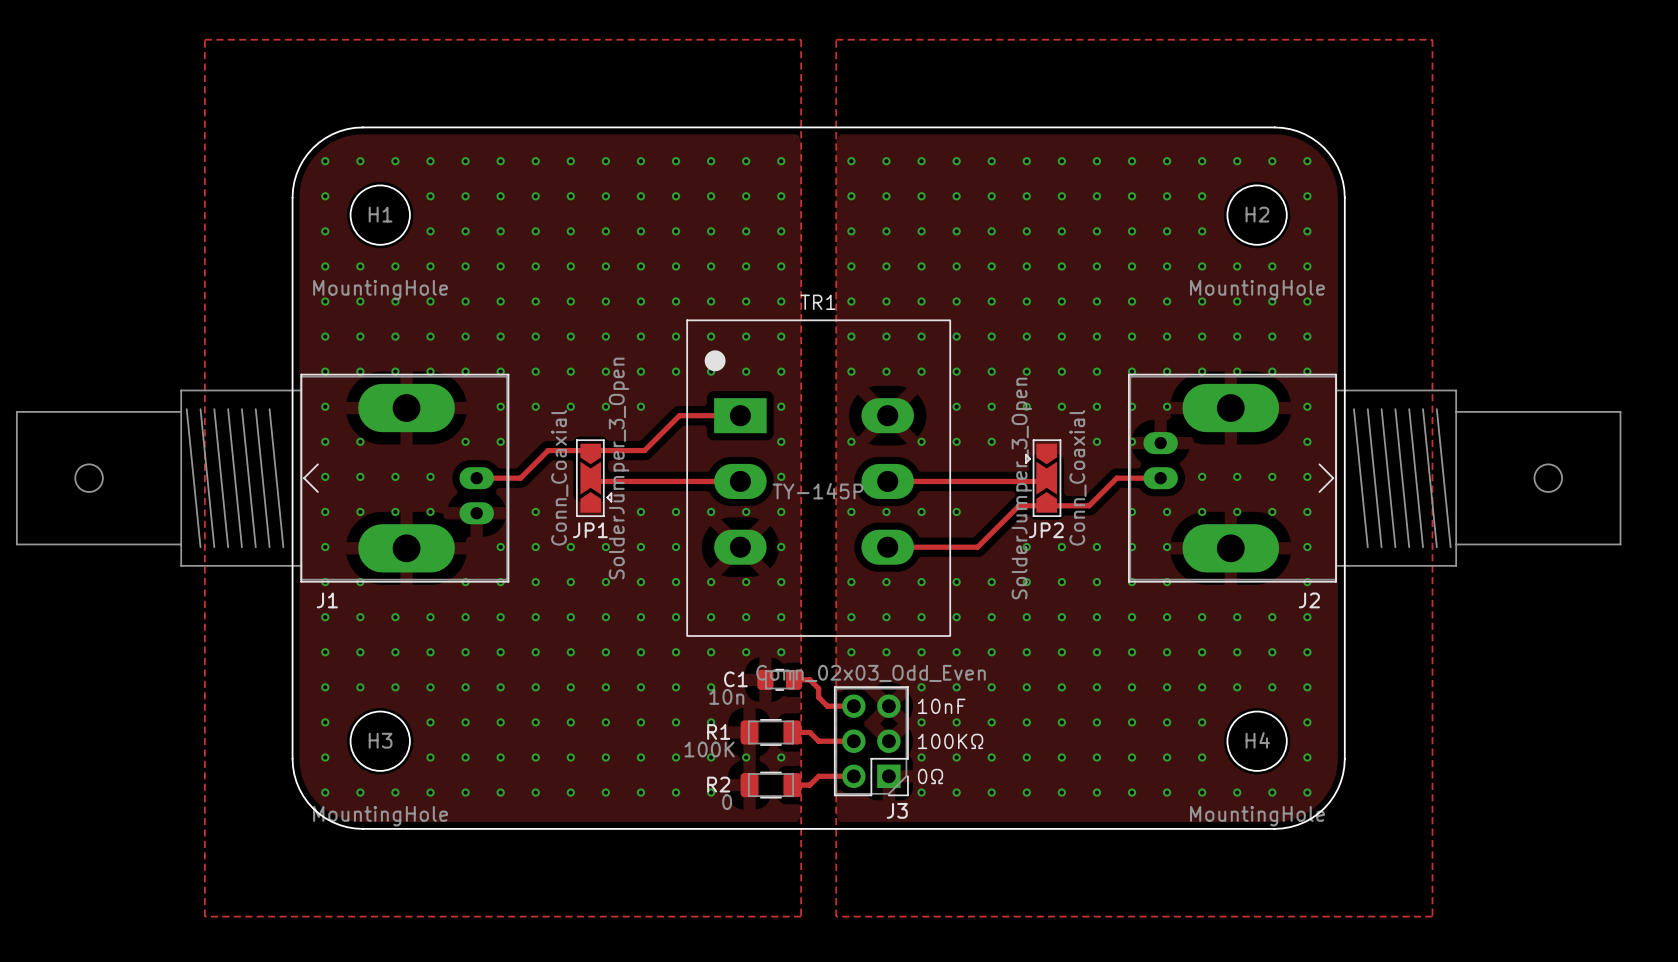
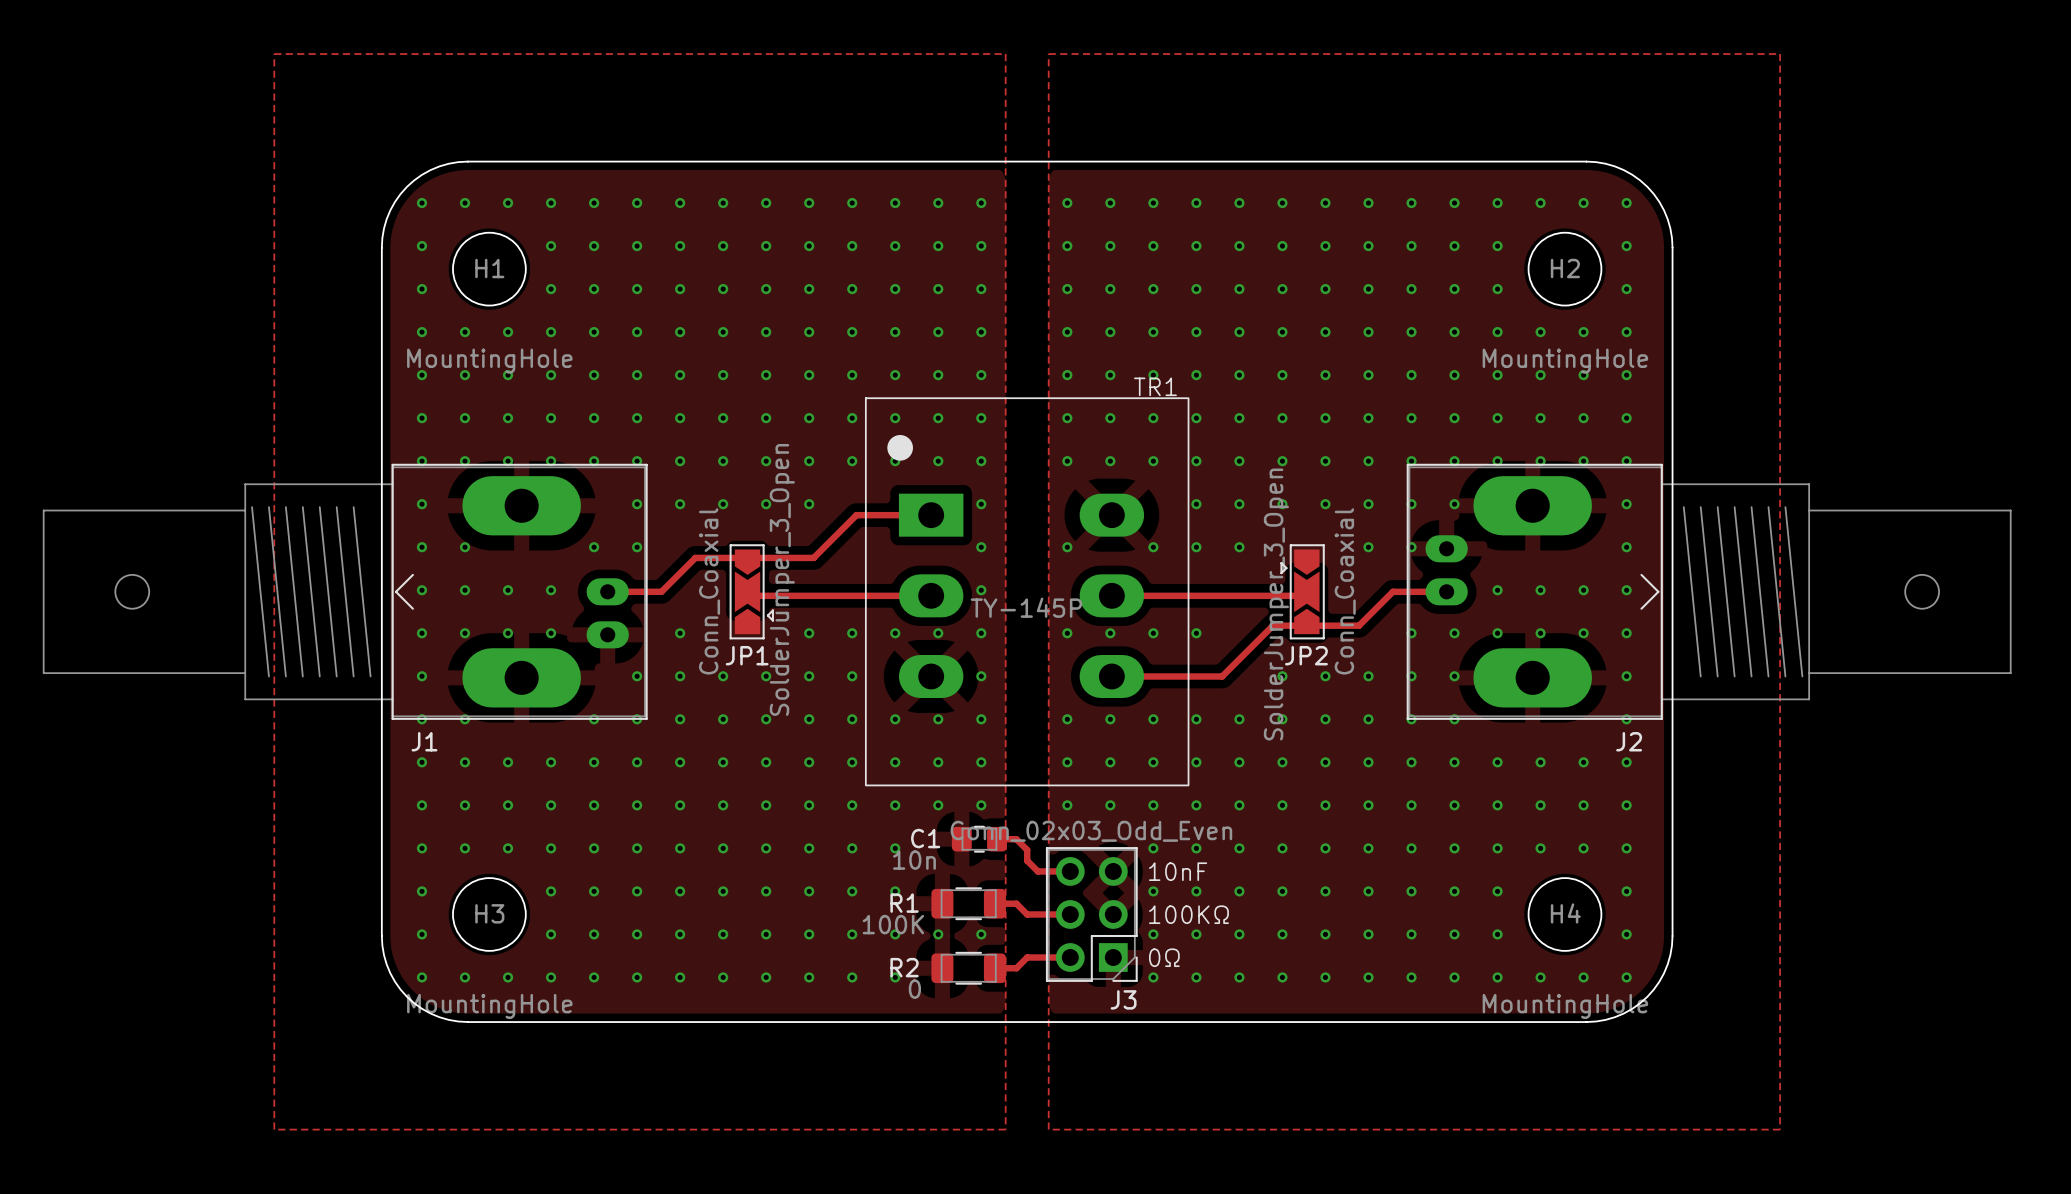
TR1 name position: TR1 (818, 302) -> TR1 (1155, 386)

